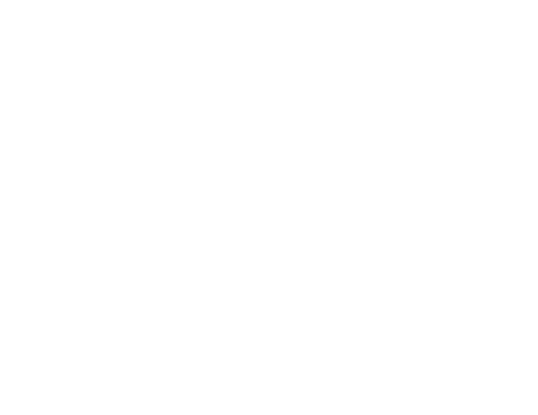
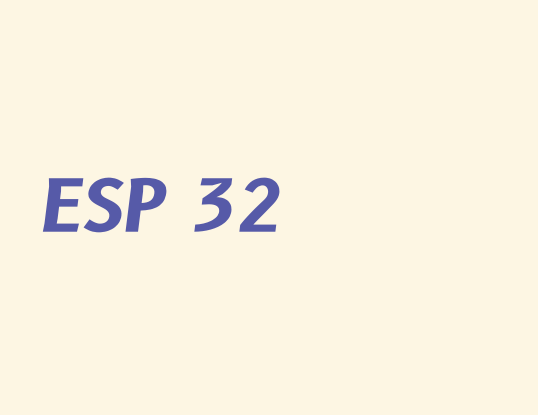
text: none -> ESP 32 (161, 204)

